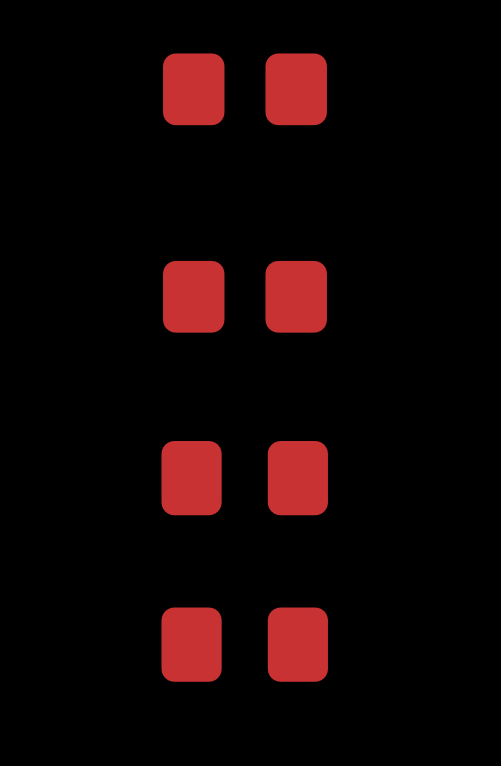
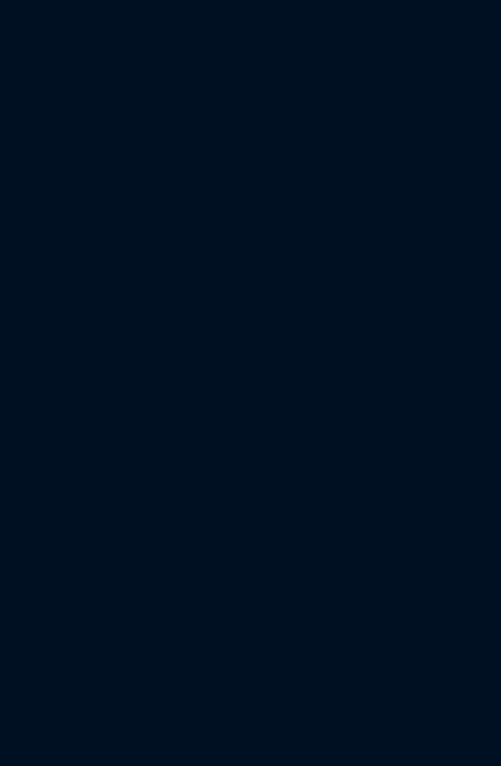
part: (244, 89) -> none
part: (244, 296) -> none
part: (244, 478) -> none
part: (244, 644) -> none

